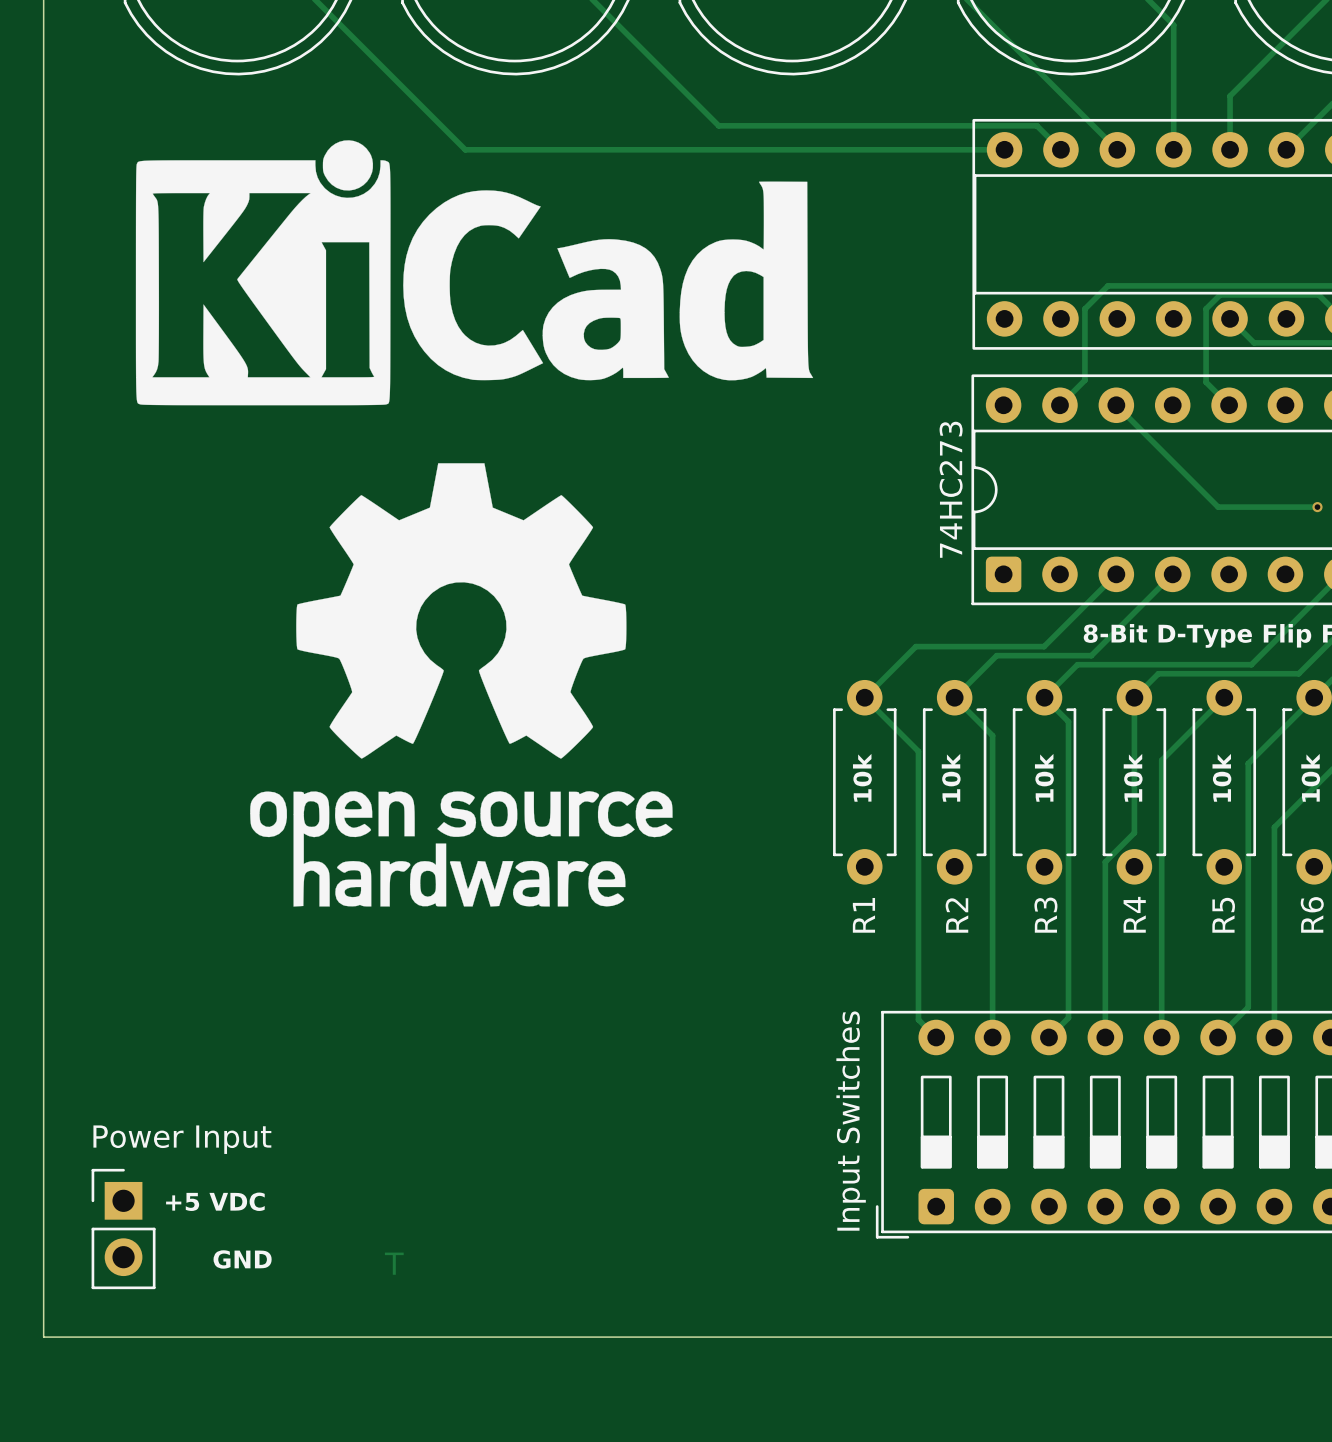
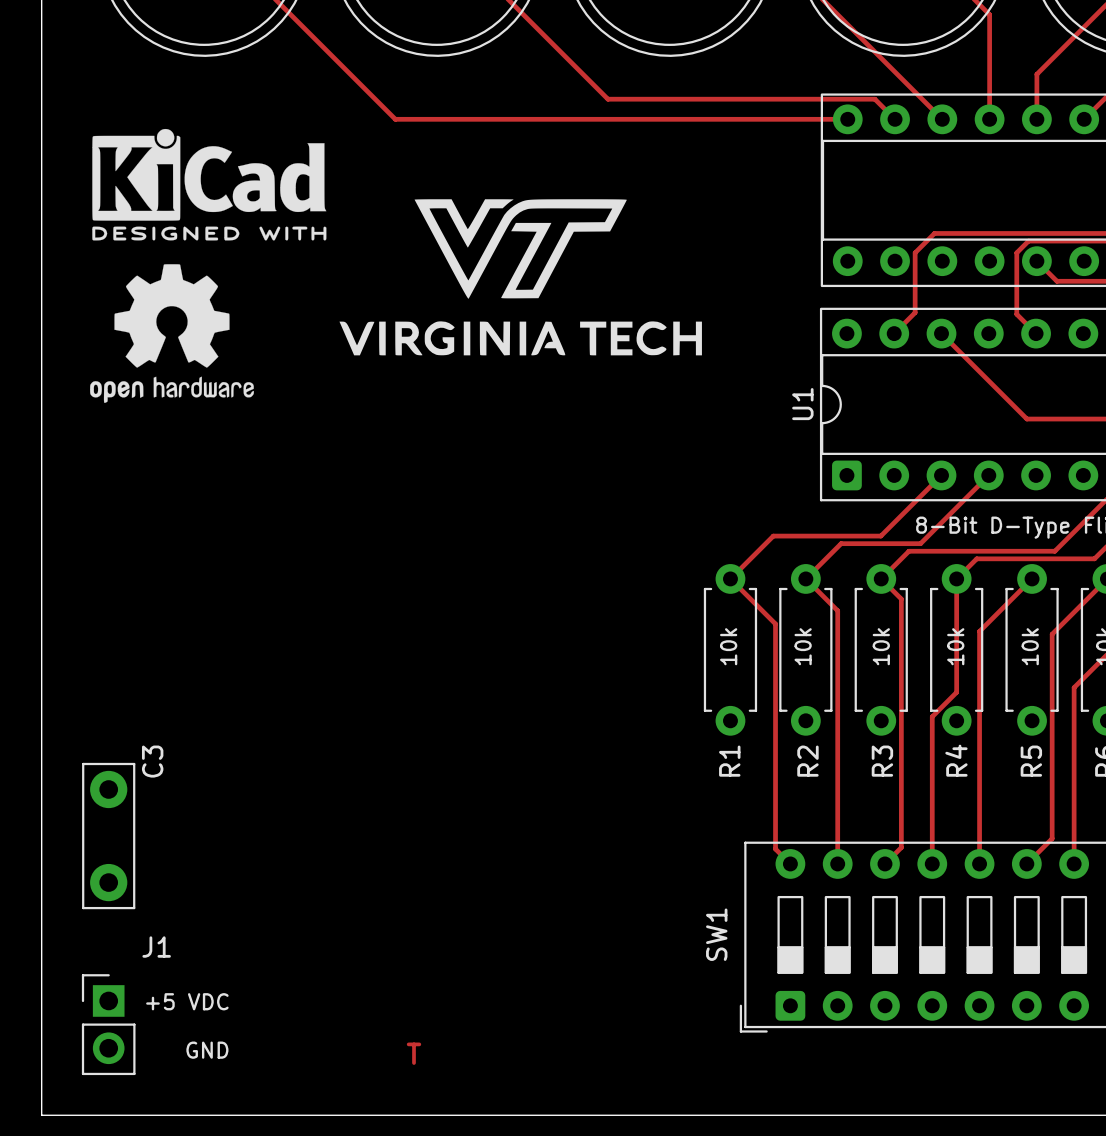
drawing: [135, 140, 814, 406] -> none
drawing: none -> [92, 128, 702, 356]
drawing: none -> [90, 264, 254, 403]
drawing: [250, 463, 673, 907] -> none
74HC273 name: 74HC273 (951, 489) -> U1 (802, 404)
C3: none -> (108, 836)
Input Switches name: Input Switches (851, 1121) -> SW1 (716, 934)
Power Input name: Power Input (182, 1139) -> J1 (156, 947)
drawing position: (394, 1263) -> (414, 1053)

